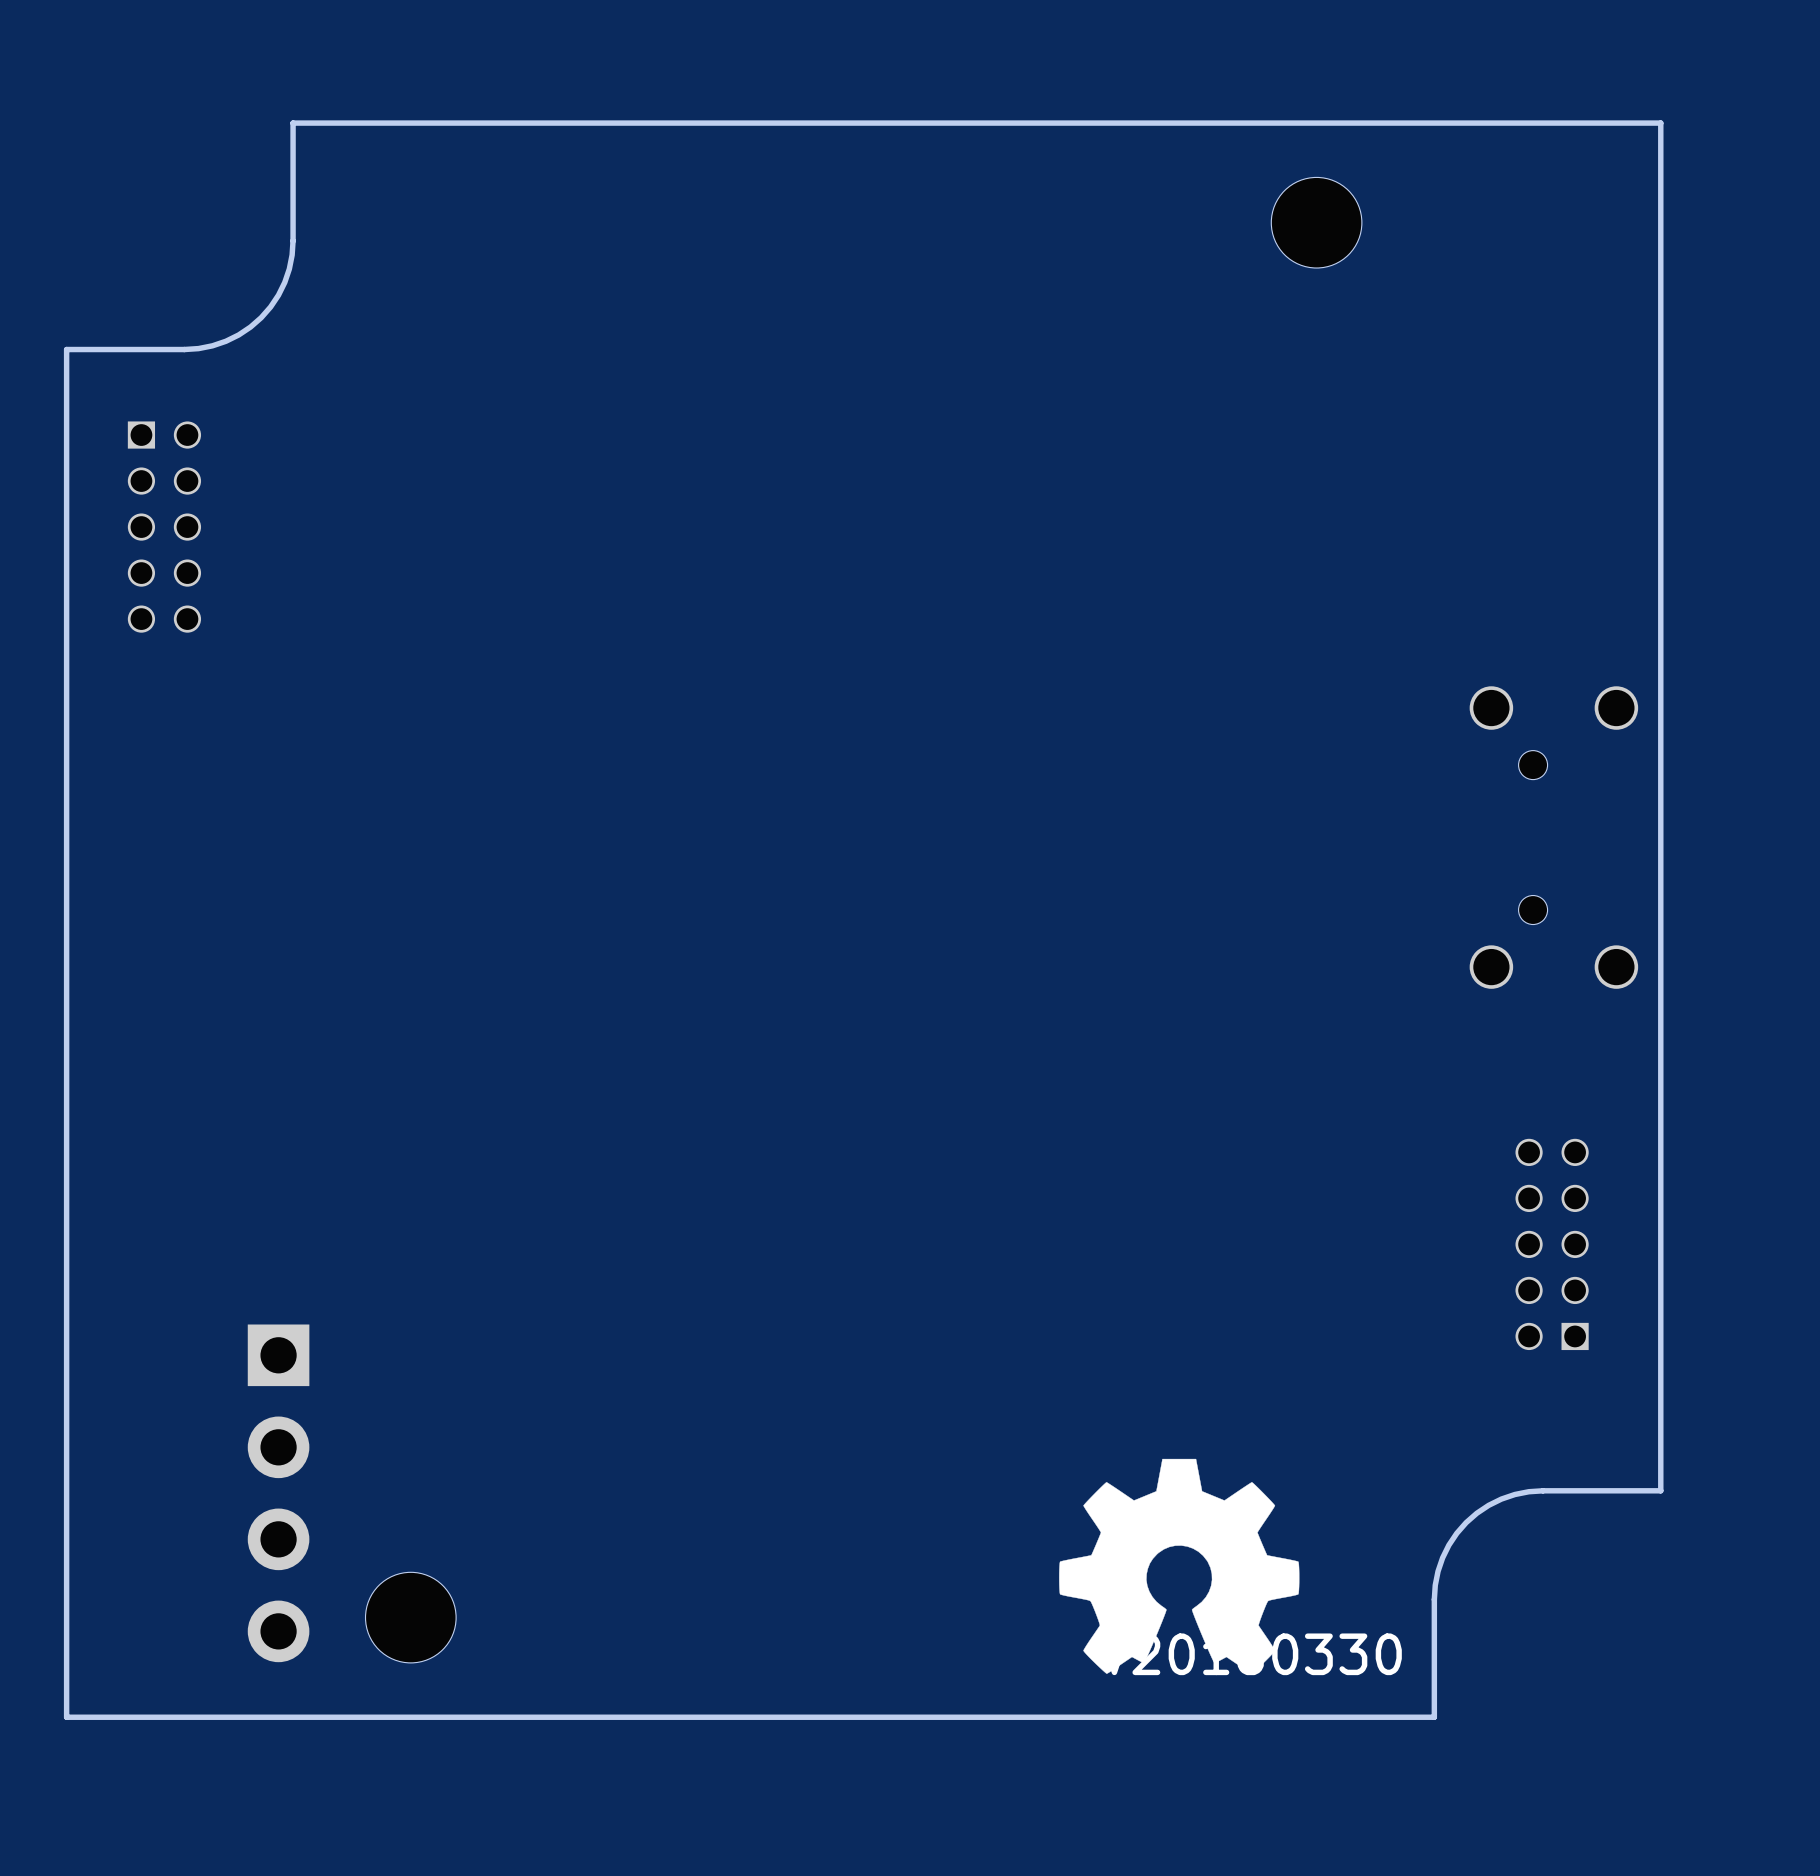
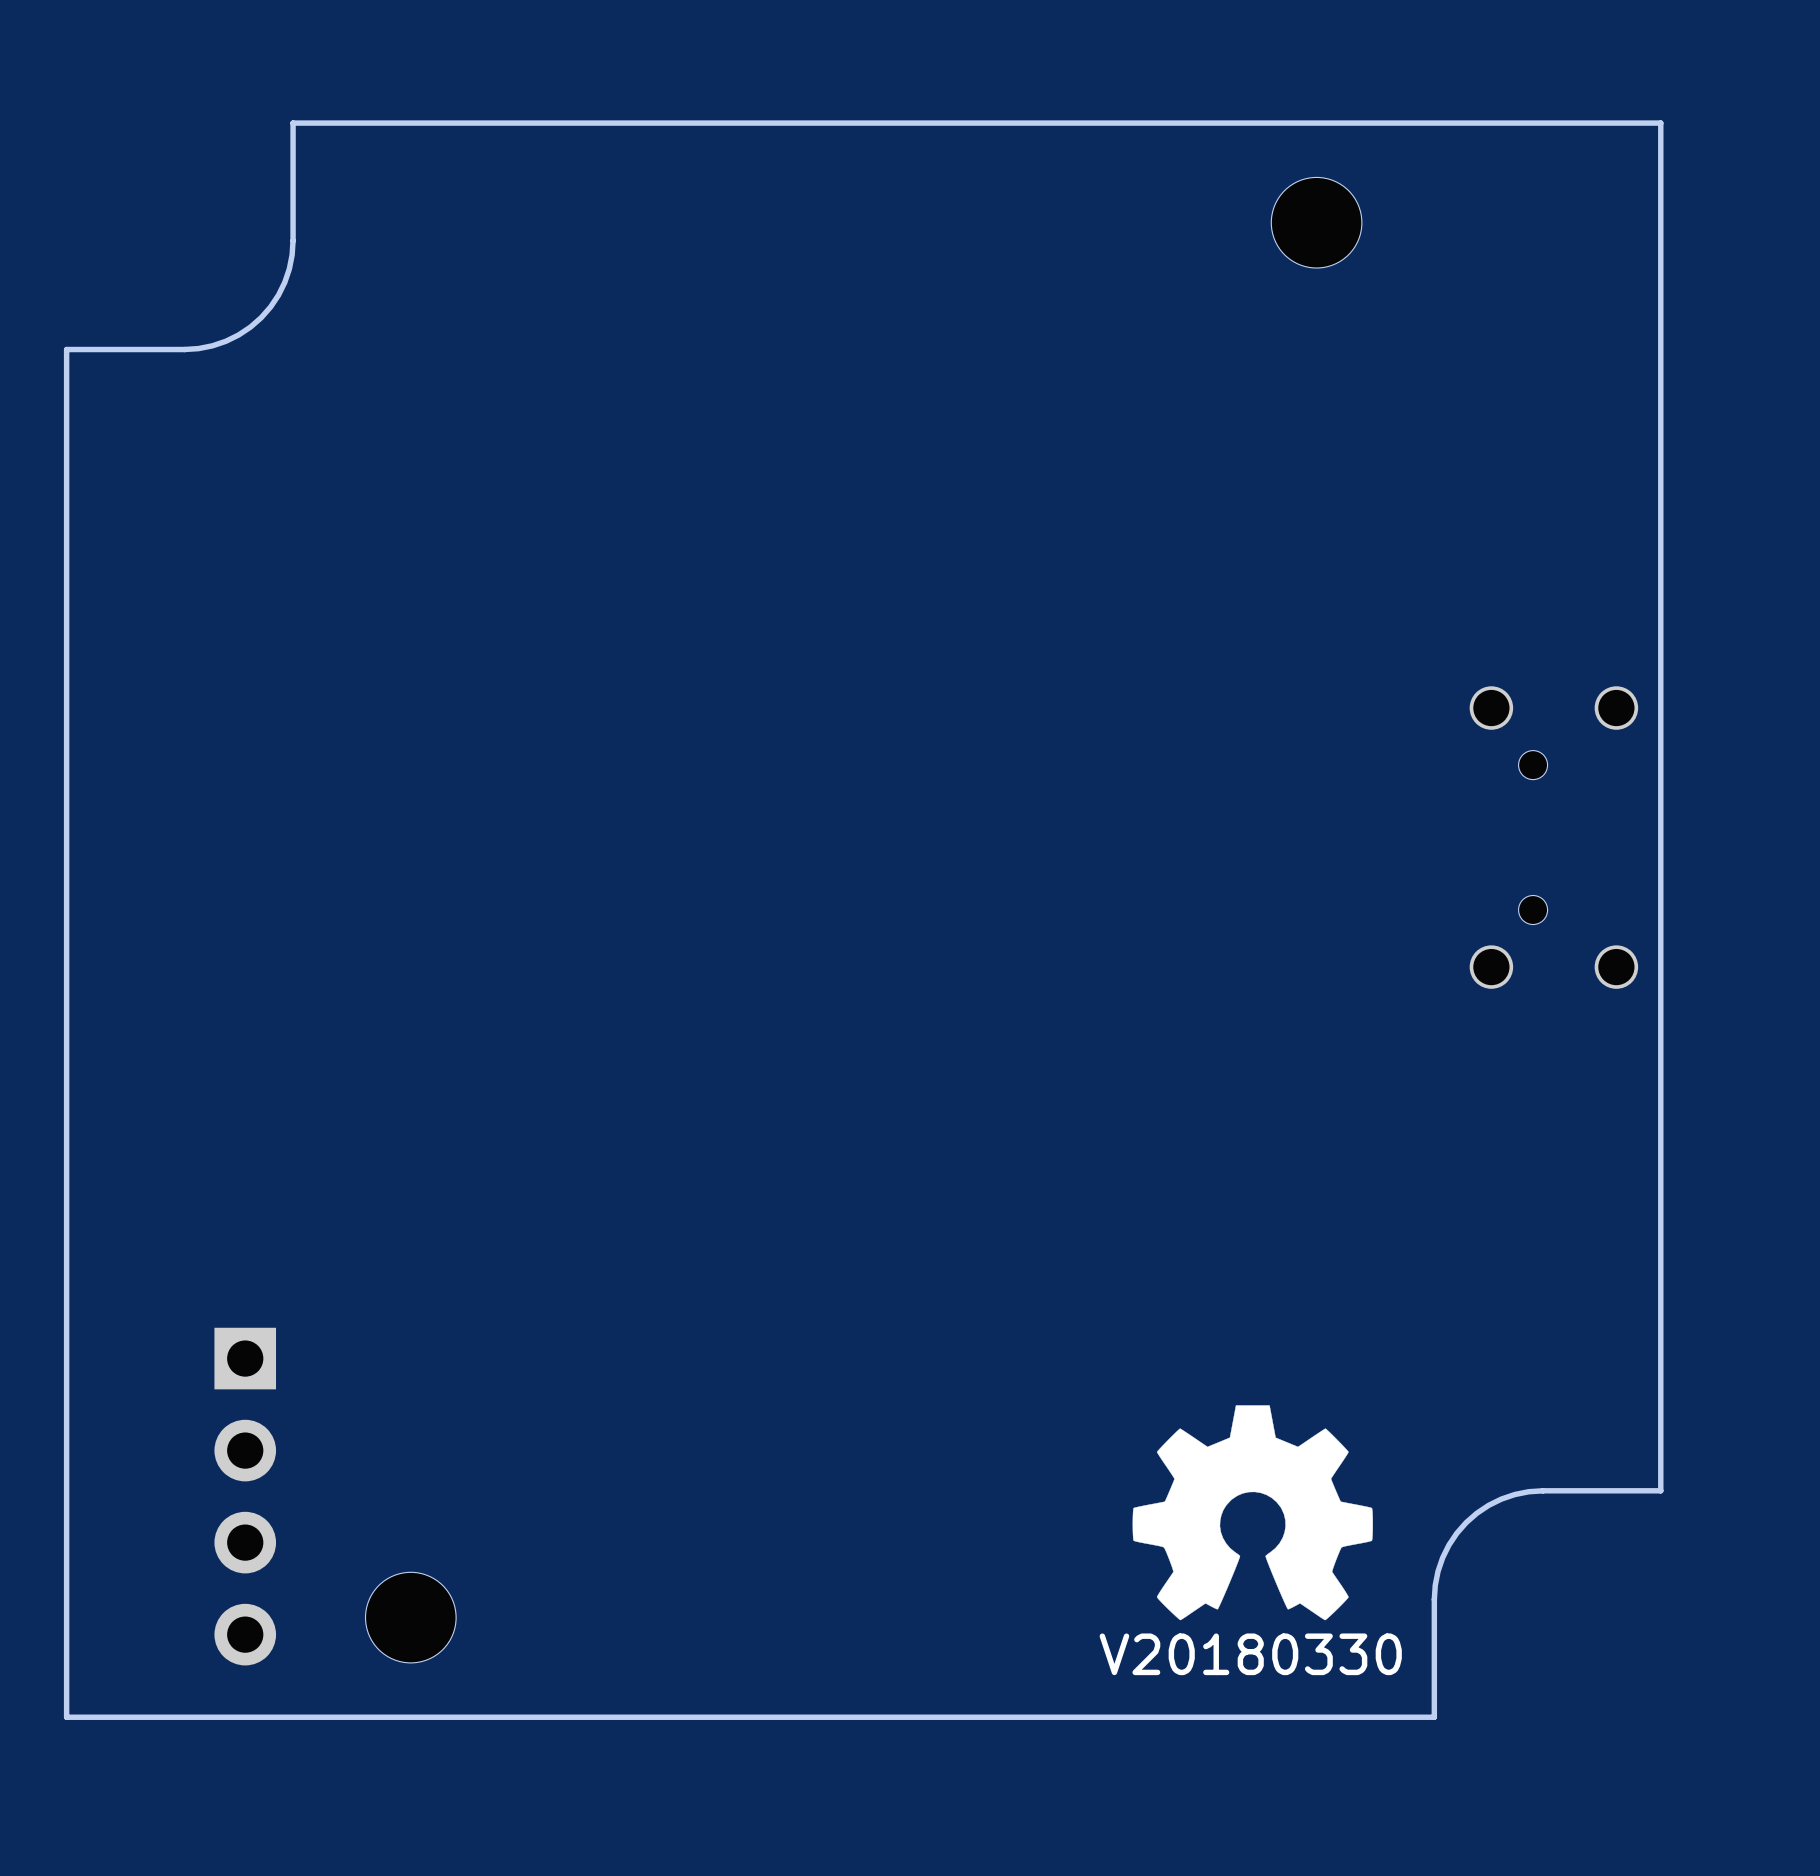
part: (164, 527) -> none
part: (1552, 1244) -> none
part position: (278, 1493) -> (245, 1496)
drawing position: (1179, 1566) -> (1252, 1512)

